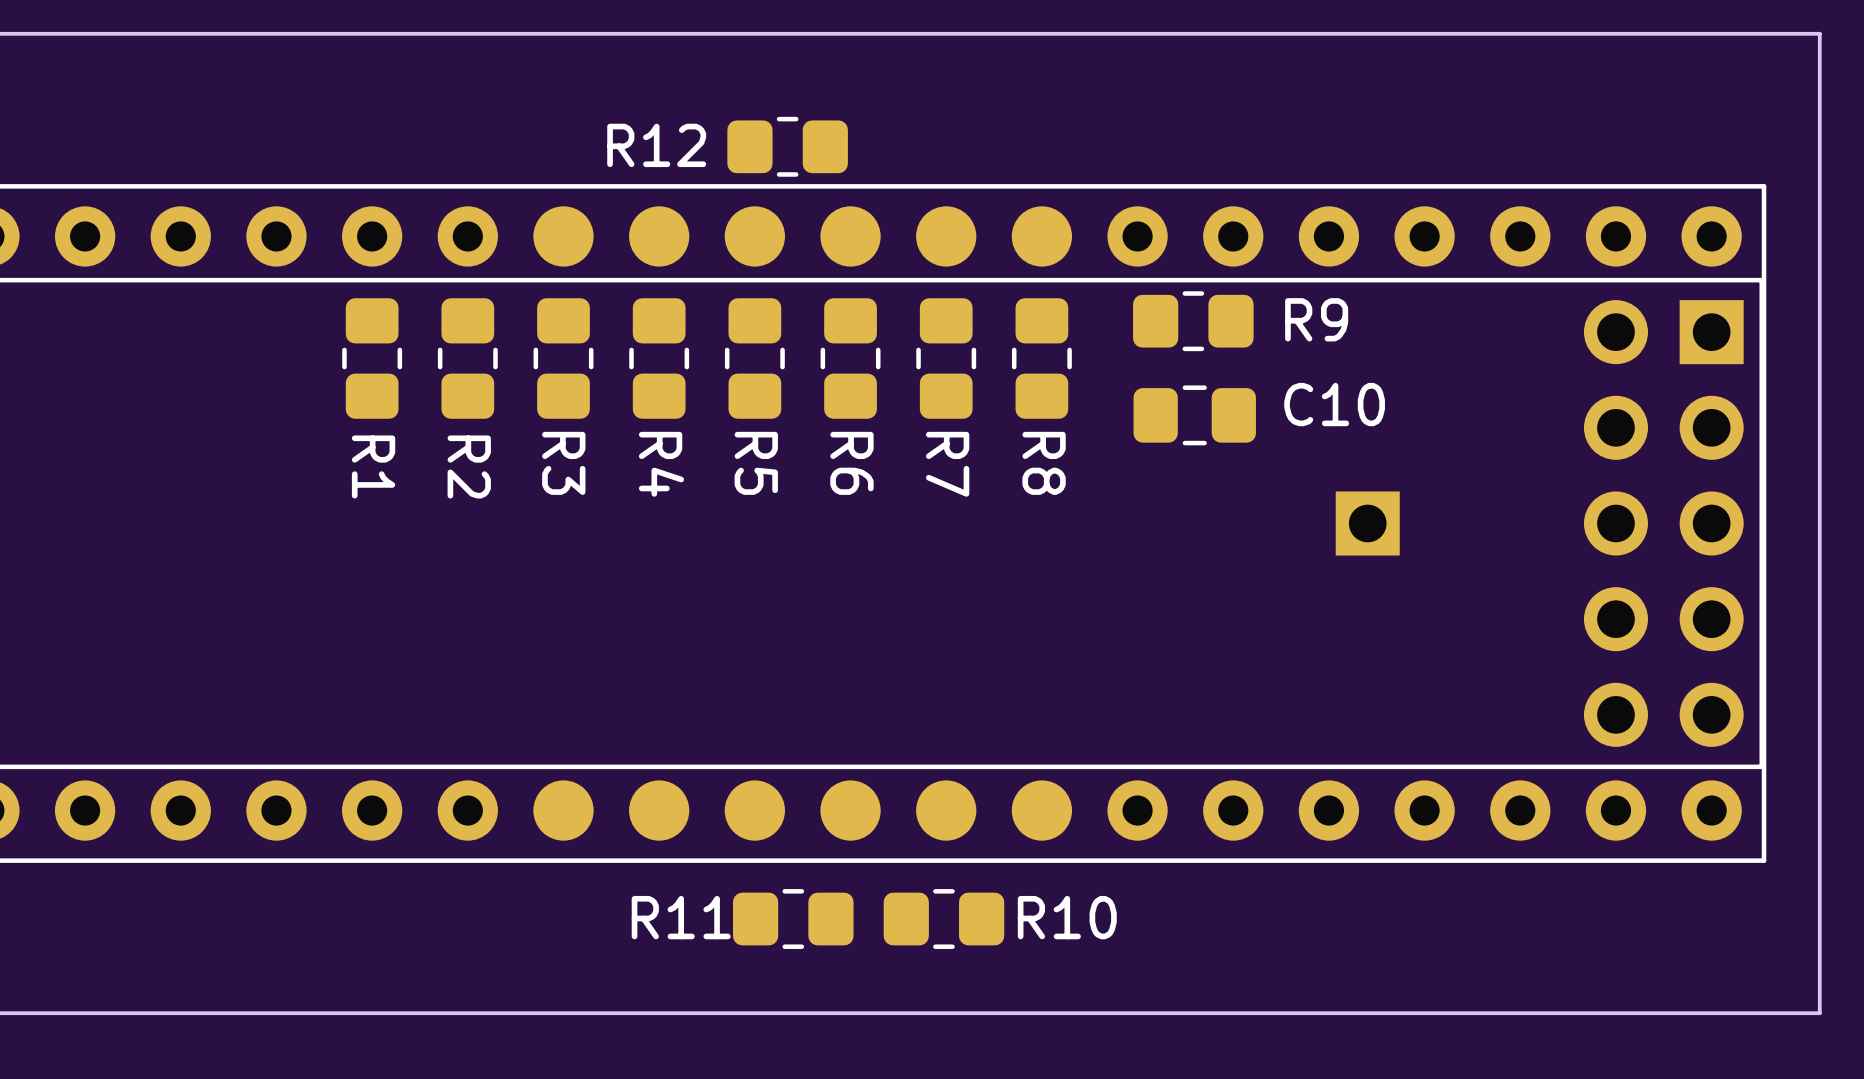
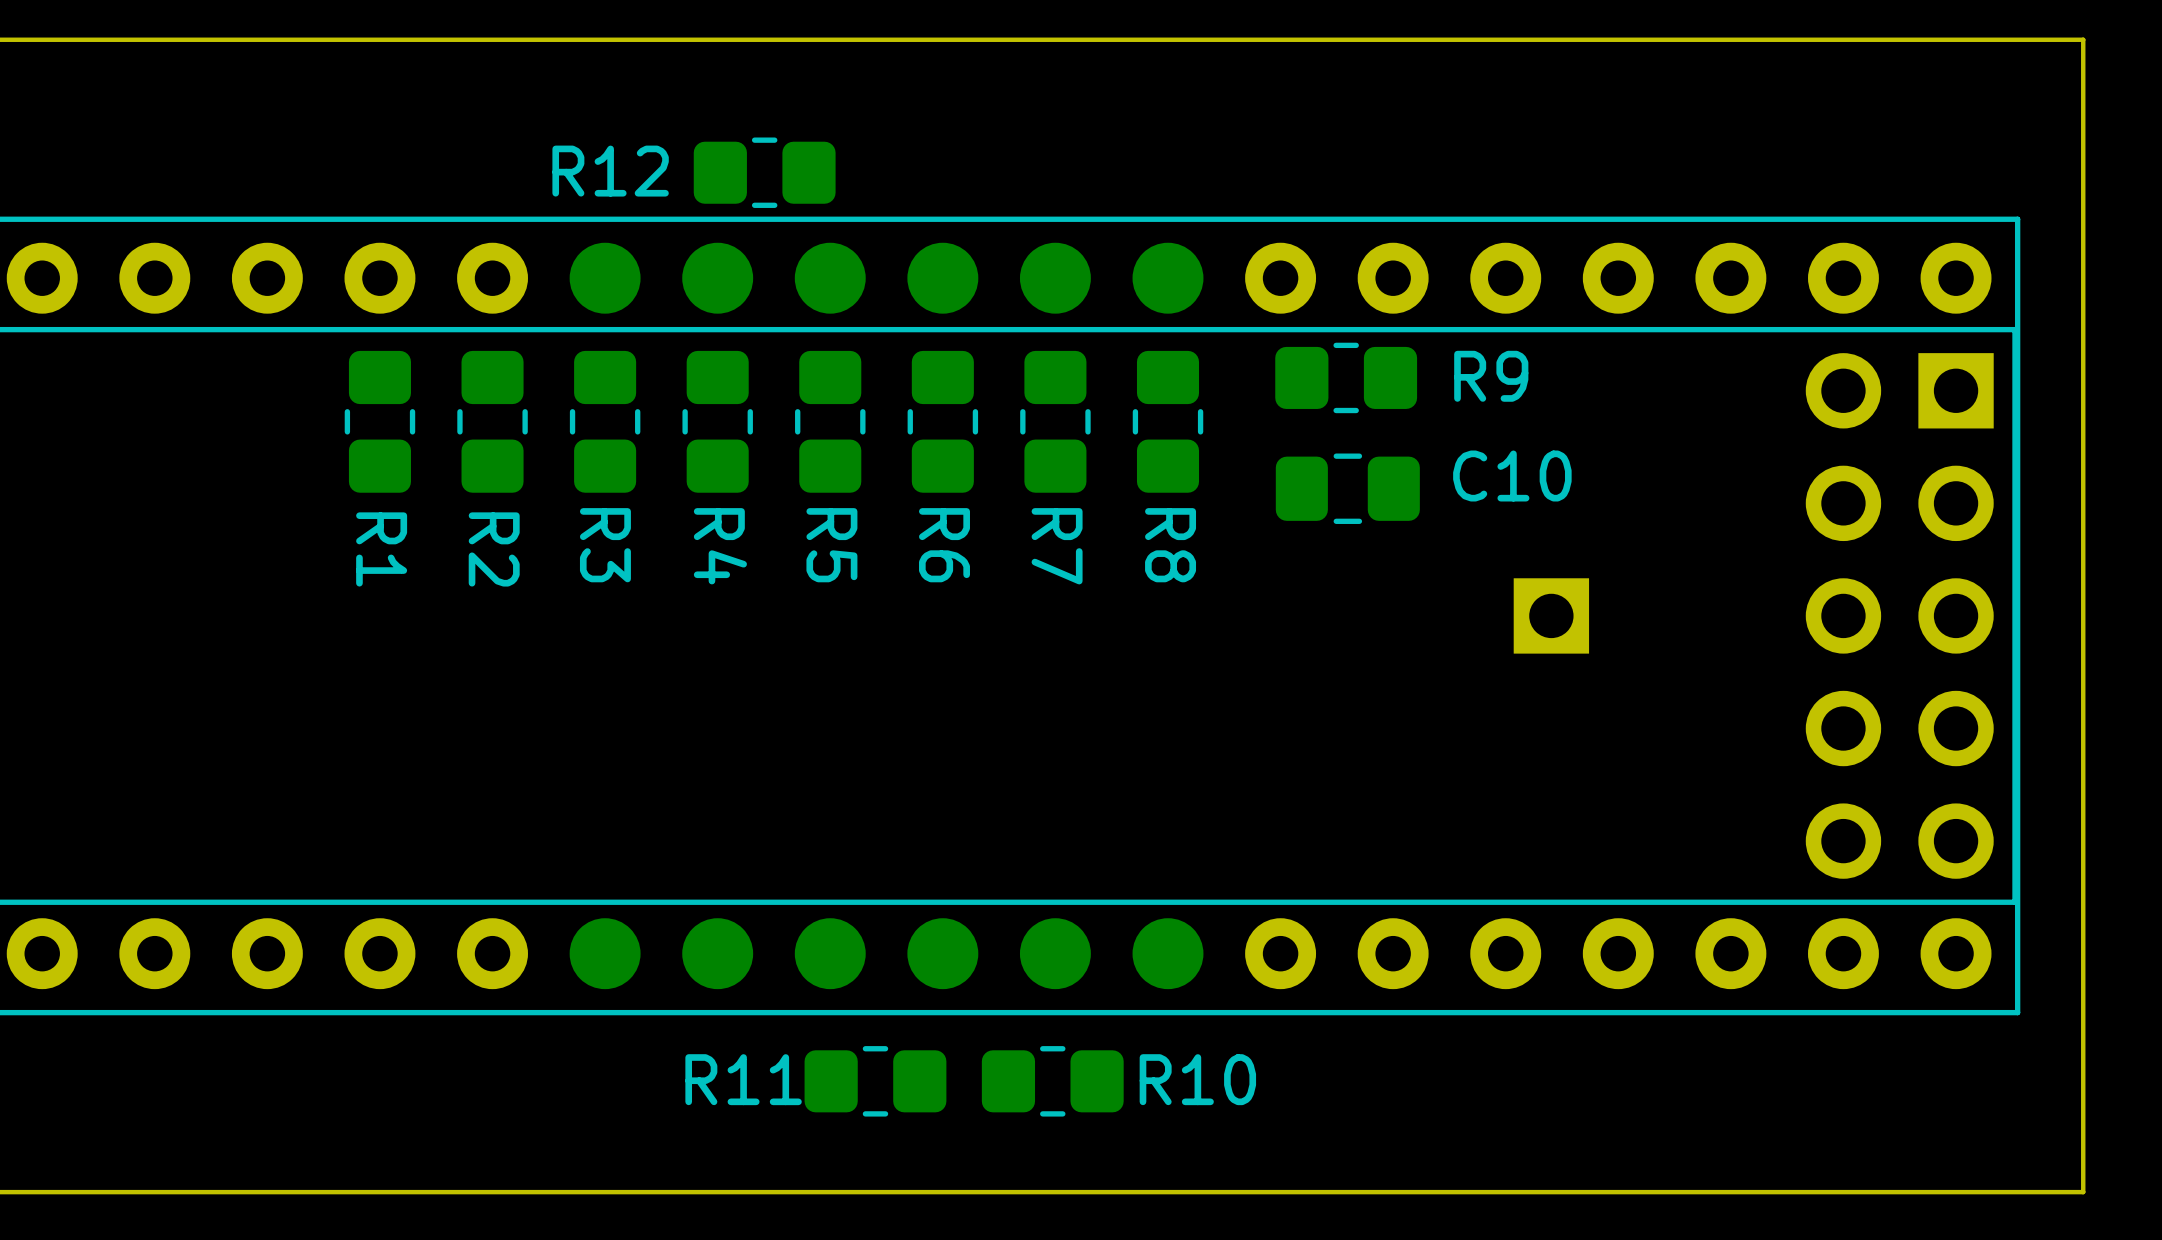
R12 position: (787, 146) -> (764, 172)

